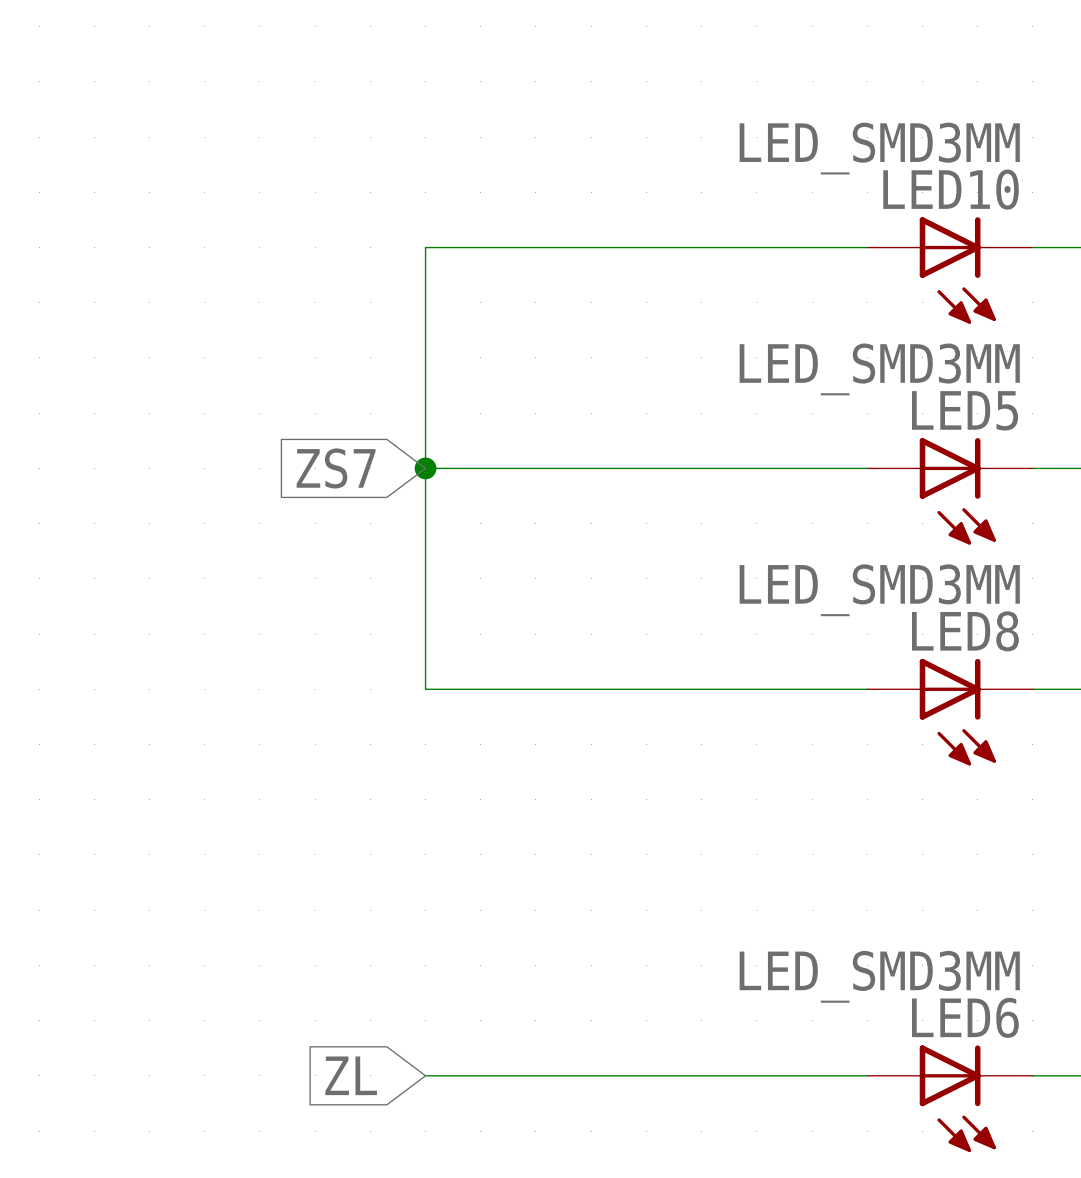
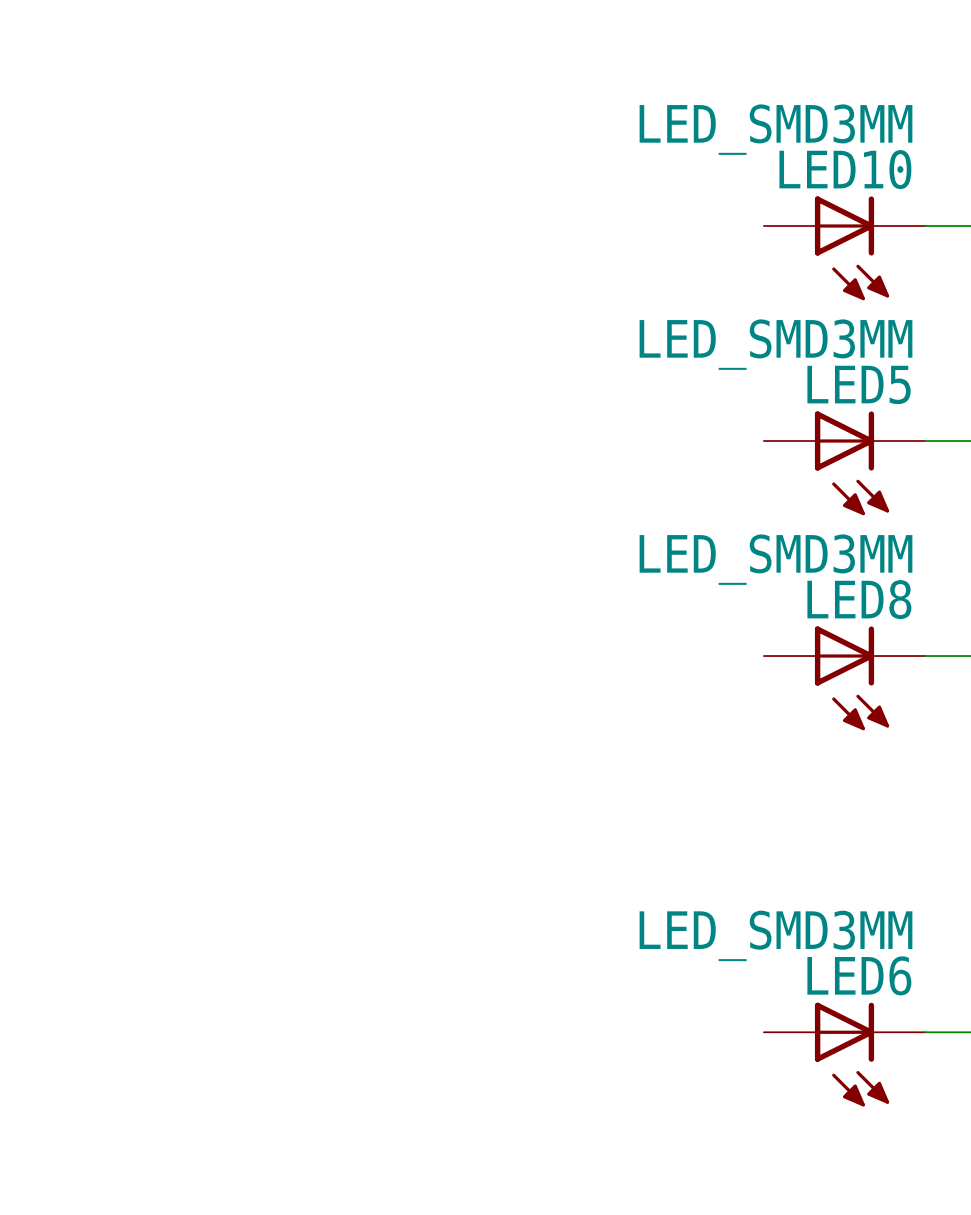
wire: (867, 247) (425, 247) (425, 689) (867, 689) -> none
global label: ZS7 (336, 468) -> none
wire: (425, 468) (867, 468) -> none
junction: (425, 468) -> none
global label: ZL (351, 1075) -> none
wire: (425, 1075) (867, 1075) -> none

